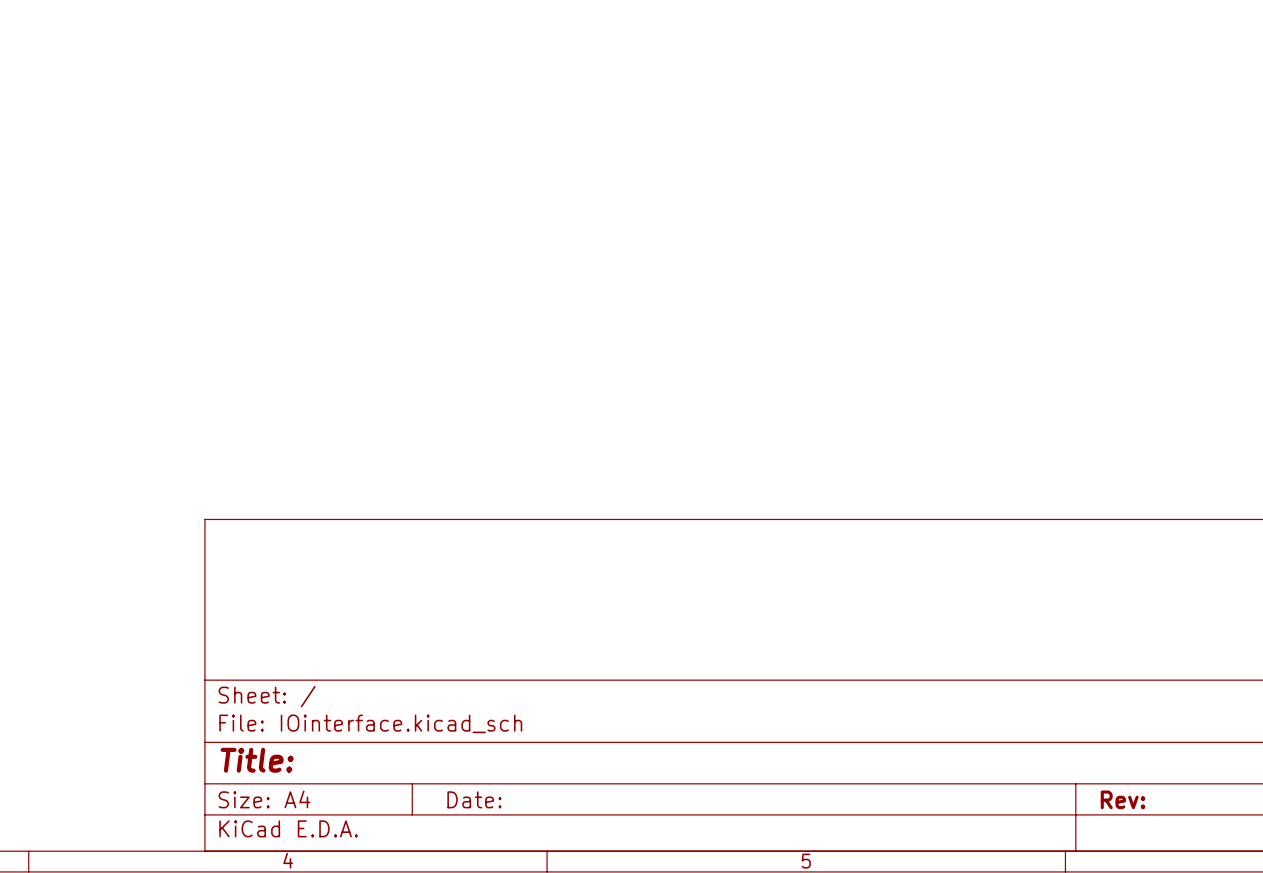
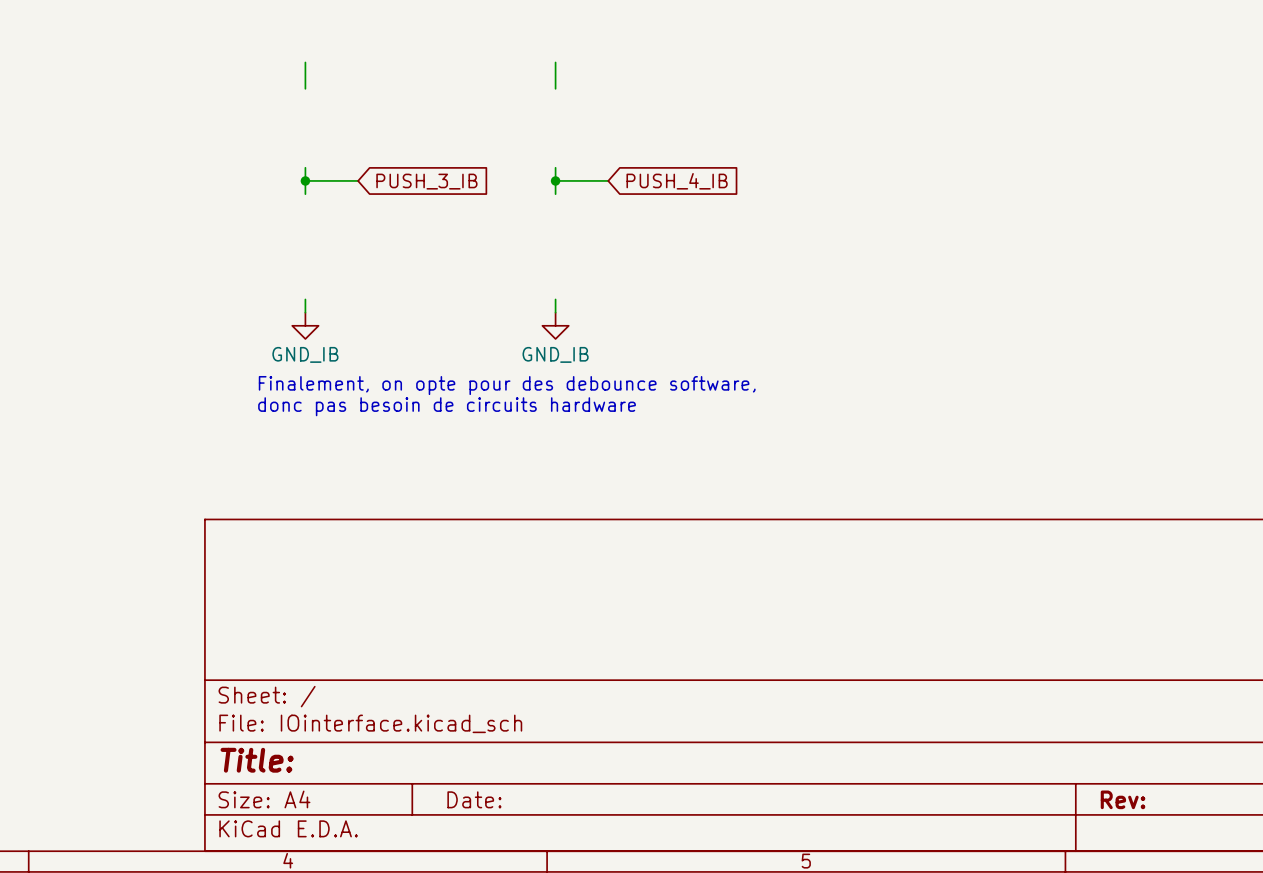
wire: none -> (305, 62) (305, 88)
wire: none -> (555, 62) (555, 88)
wire: none -> (305, 167) (305, 194)
wire: none -> (555, 167) (555, 194)
wire: none -> (305, 180) (358, 180)
junction: none -> (305, 180)
wire: none -> (555, 180) (608, 180)
junction: none -> (555, 180)
global label: none -> PUSH_3_IB (426, 181)
global label: none -> PUSH_4_IB (677, 181)
wire: none -> (305, 299) (305, 312)
wire: none -> (555, 299) (555, 312)
power symbol: none -> GND_IB (305, 325)
power symbol: none -> GND_IB (555, 325)
text: none -> Finalement, on opte pour des debounce software, (507, 385)
text: none -> donc pas besoin de circuits hardware (447, 406)

